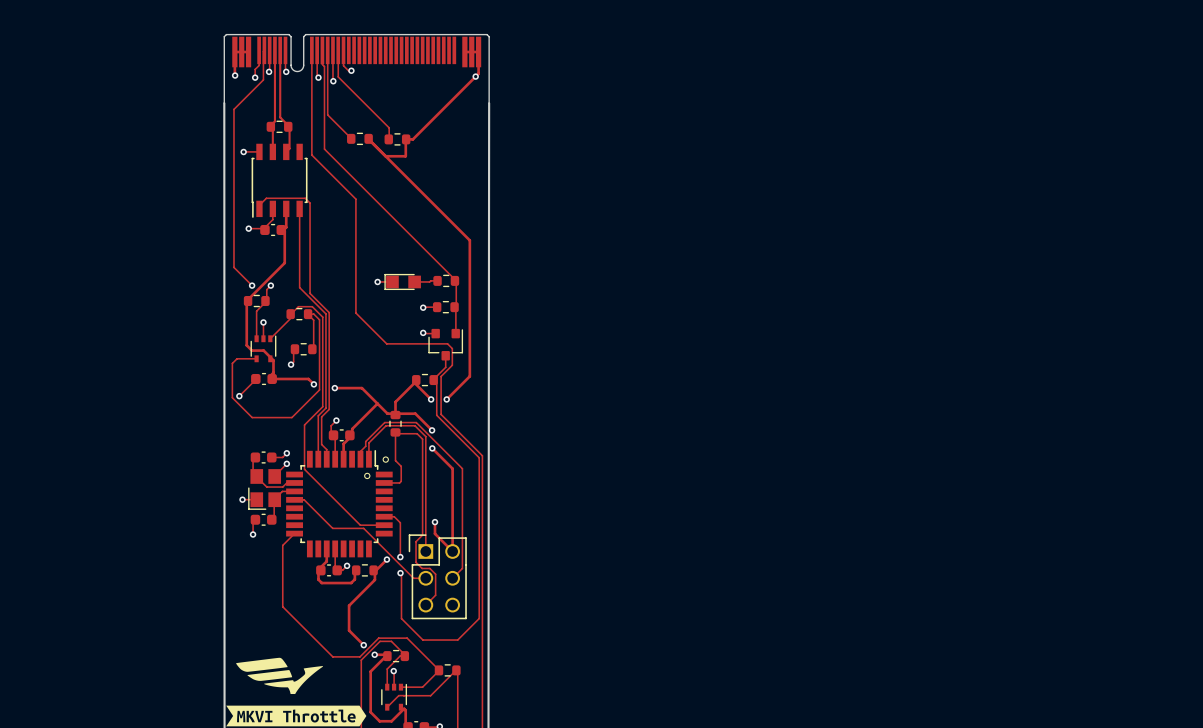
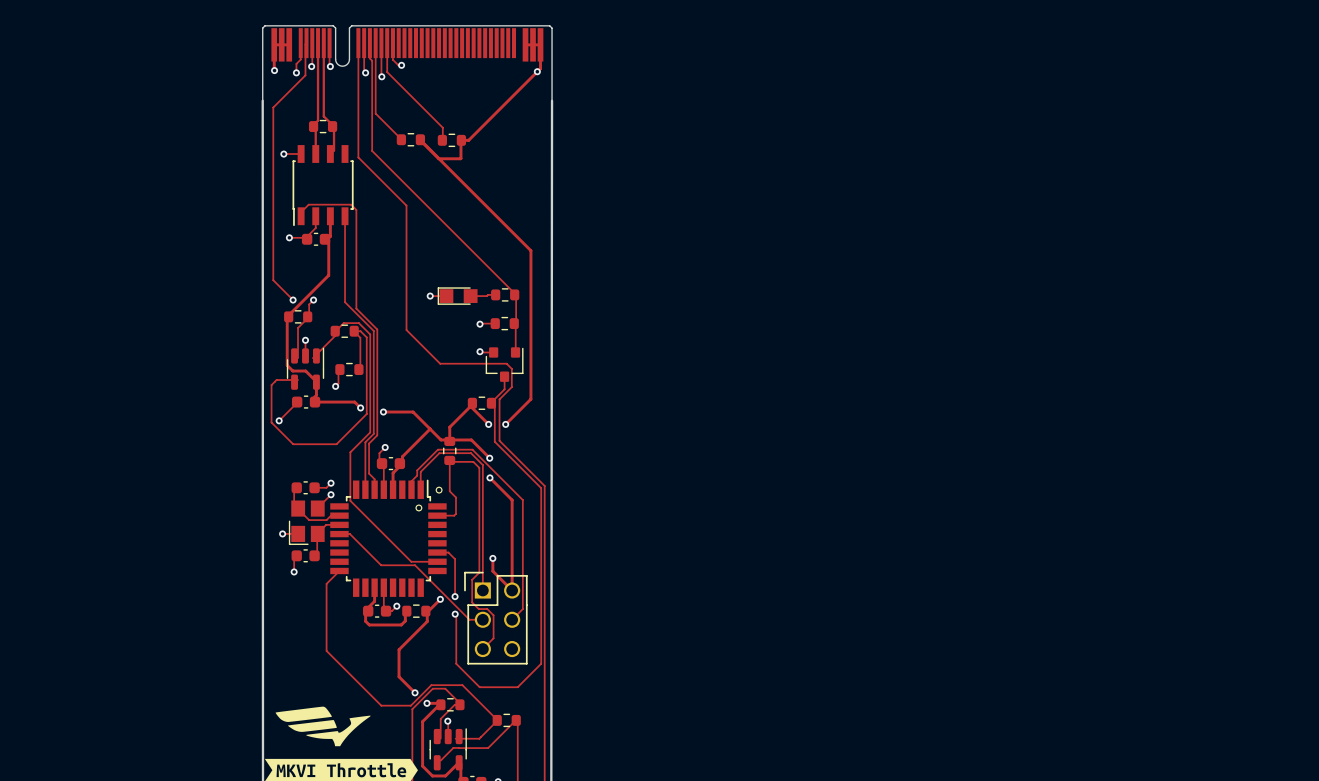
part footprint: [250, 335, 277, 363] -> [286, 347, 325, 390]
part footprint: [381, 683, 407, 711] -> [429, 728, 467, 771]

